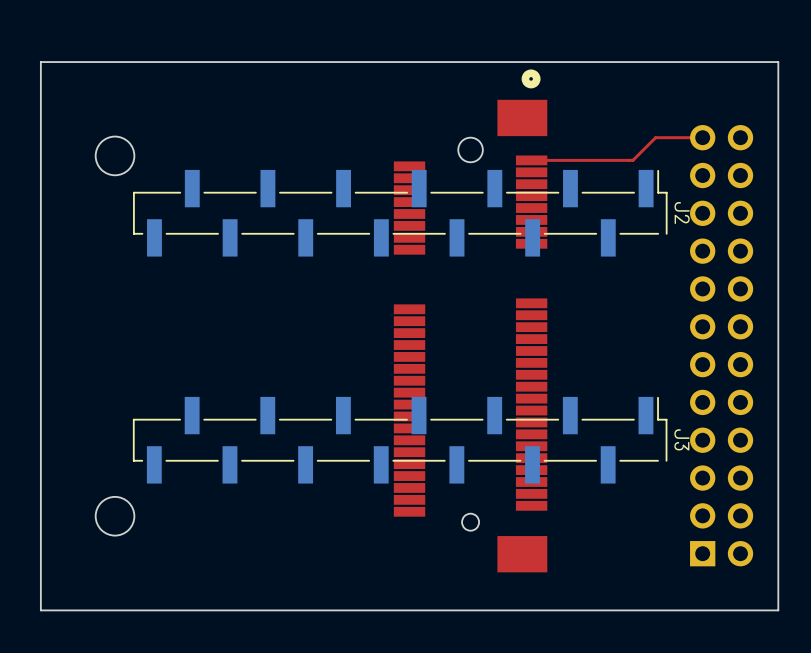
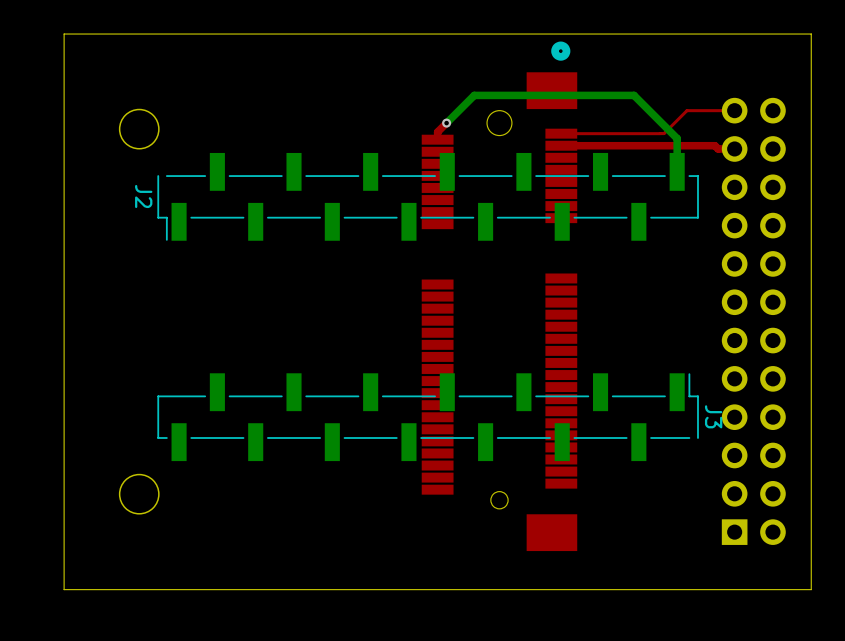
top track: none -> (446, 123) (437, 132) (437, 139)
bottom track: none -> (446, 123) (474, 95) (634, 95) (677, 138) (677, 171)
via: none -> (446, 123)
top track: none -> (561, 145) (714, 145) (718, 148) (734, 148)
J2 rotation: 0° (400, 213) -> 180° (428, 196)

